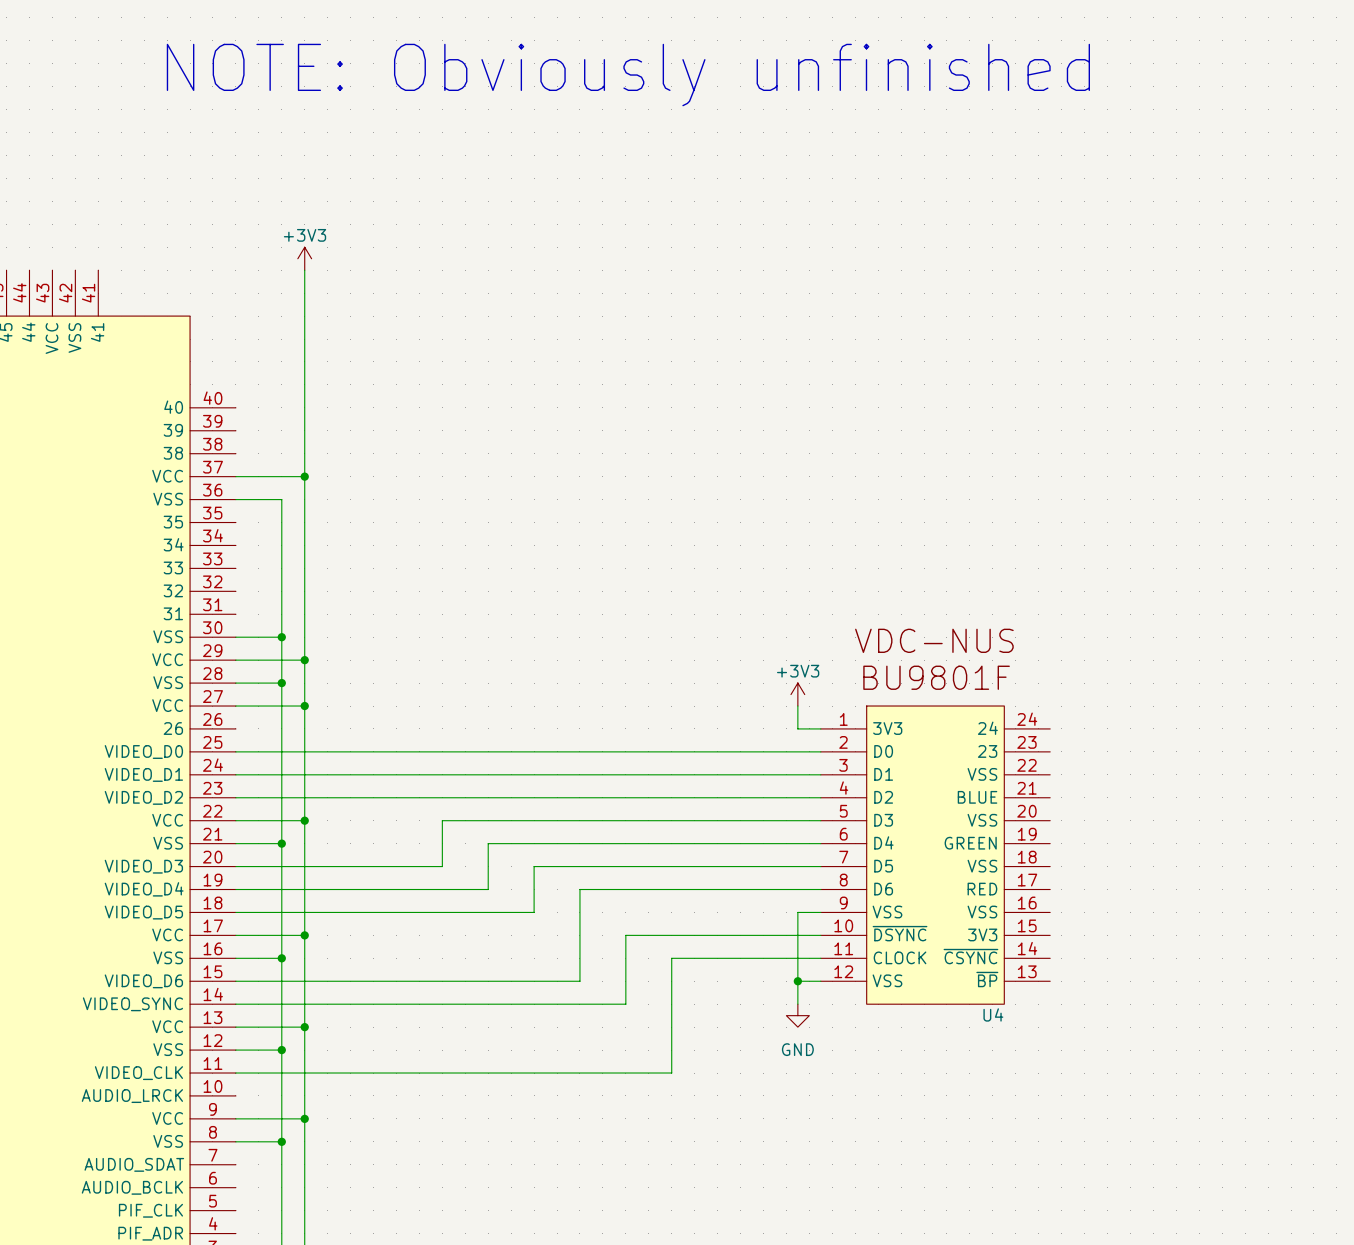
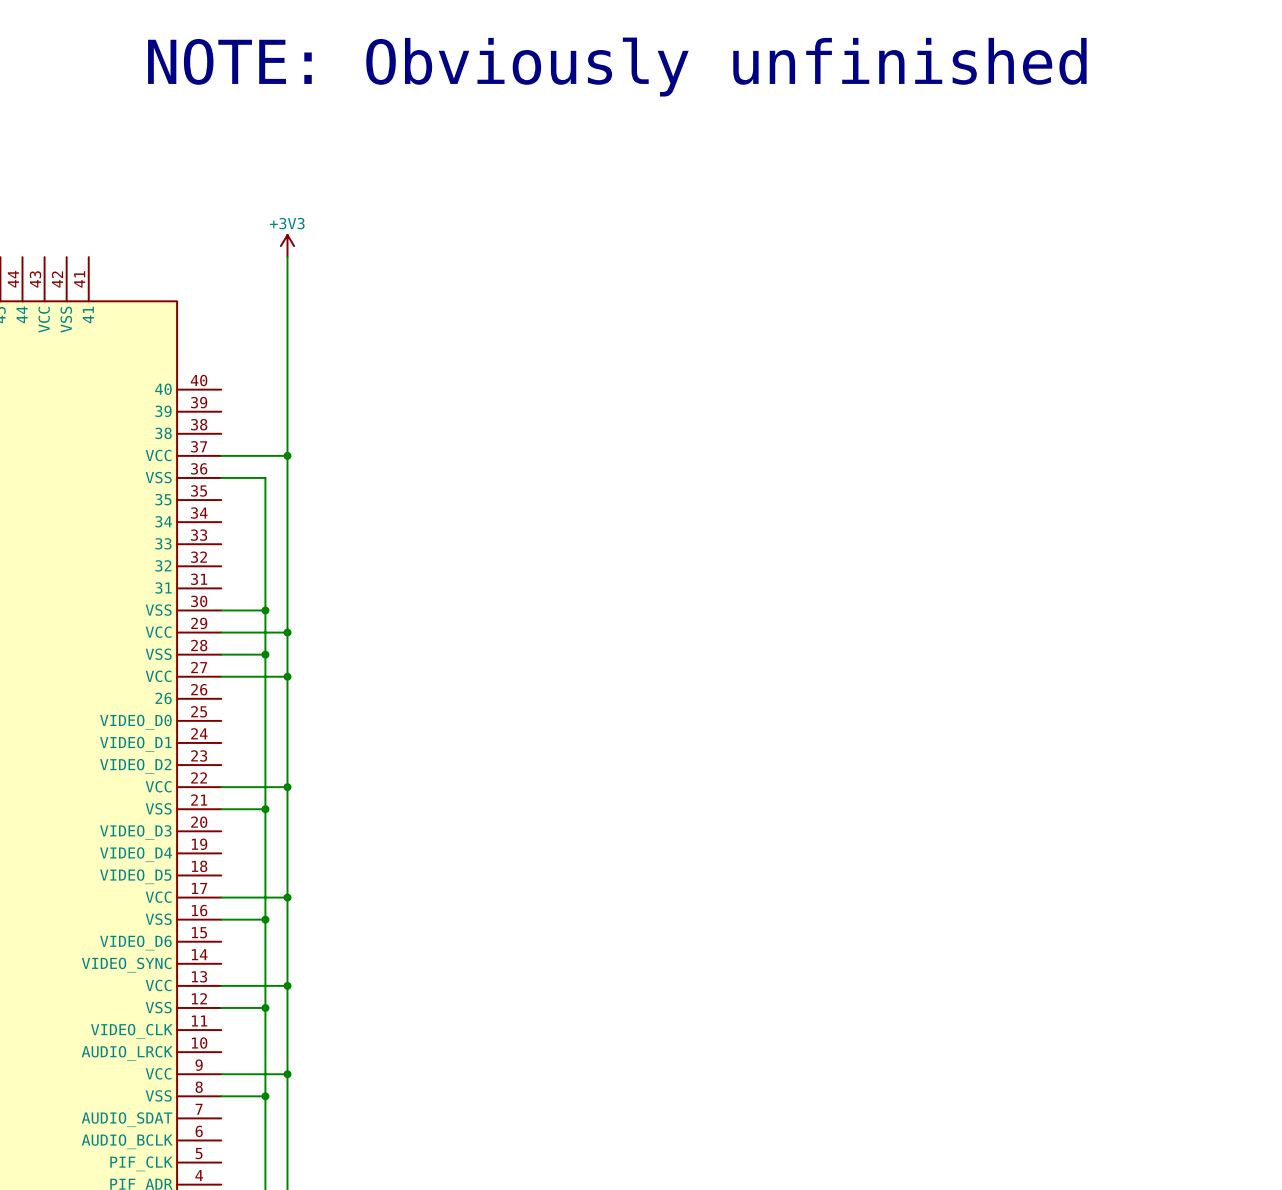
power symbol: +3V3 (797, 694) -> none
wire: (797, 706) (797, 728) (820, 728) -> none
wire: (235, 751) (820, 751) -> none
wire: (235, 774) (820, 774) -> none
wire: (235, 797) (820, 797) -> none
wire: (820, 820) (442, 820) (442, 866) (235, 866) -> none
wire: (820, 843) (488, 843) (488, 889) (235, 889) -> none
U4: (935, 855) -> none
wire: (820, 866) (534, 866) (534, 912) (235, 912) -> none
wire: (820, 889) (579, 889) (579, 981) (235, 981) -> none
wire: (820, 912) (797, 912) (797, 1004) -> none
wire: (820, 935) (625, 935) (625, 1004) (235, 1004) -> none
wire: (820, 958) (671, 958) (671, 1073) (235, 1073) -> none
wire: (797, 981) (820, 981) -> none
junction: (797, 981) -> none
power symbol: GND (797, 1015) -> none

